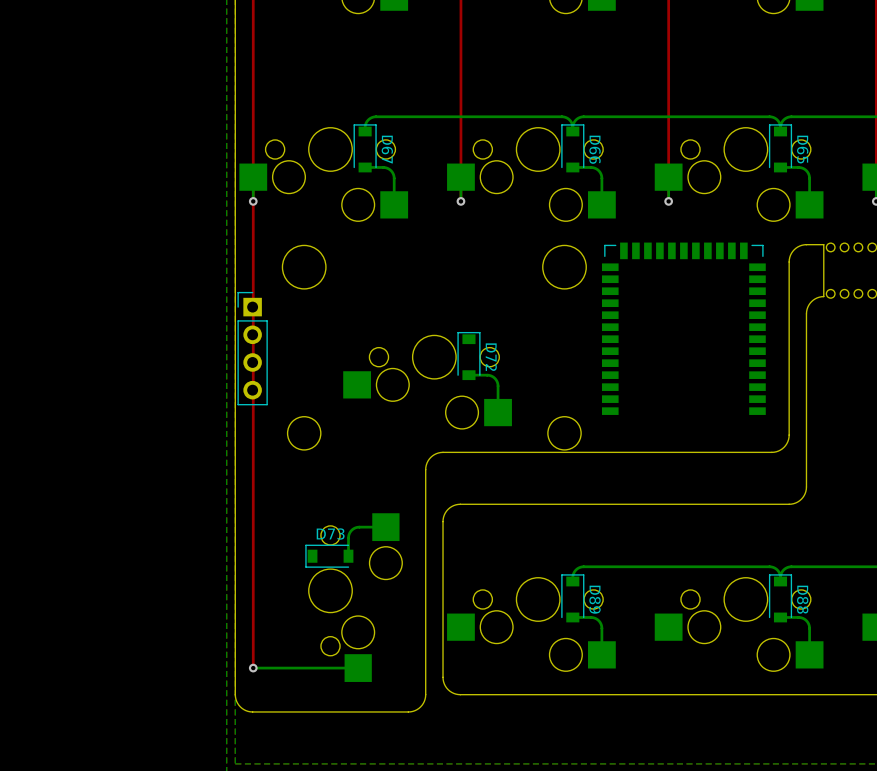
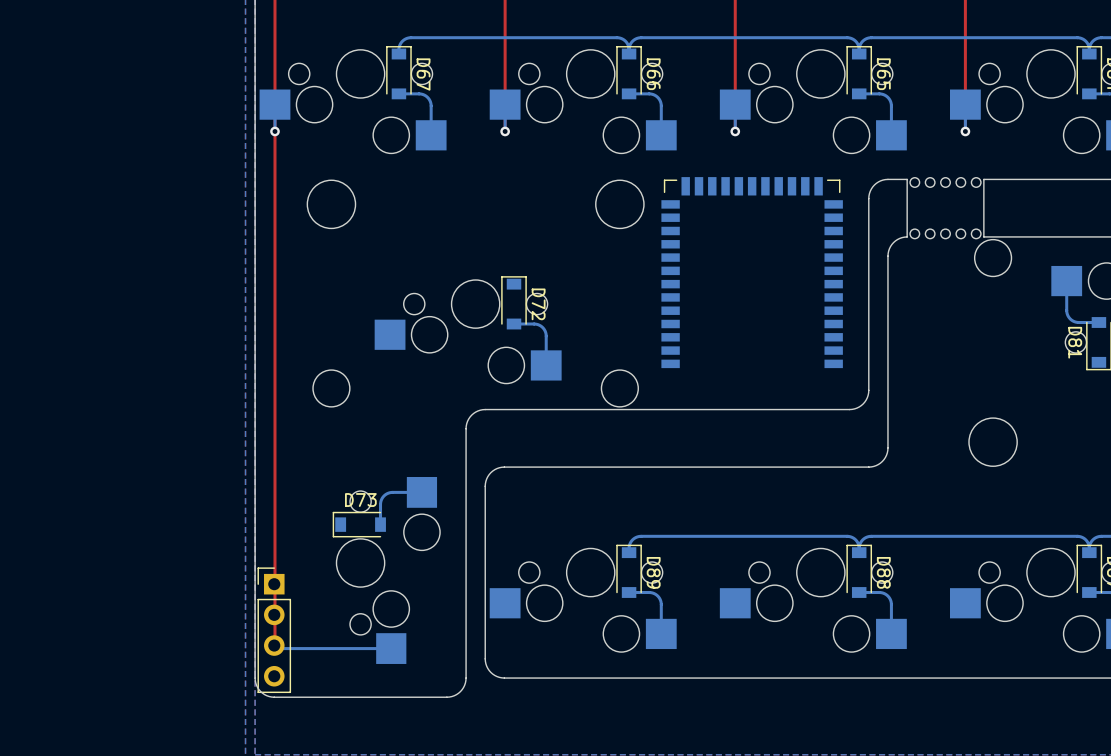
part: (252, 348) -> none
part: none -> (274, 630)

